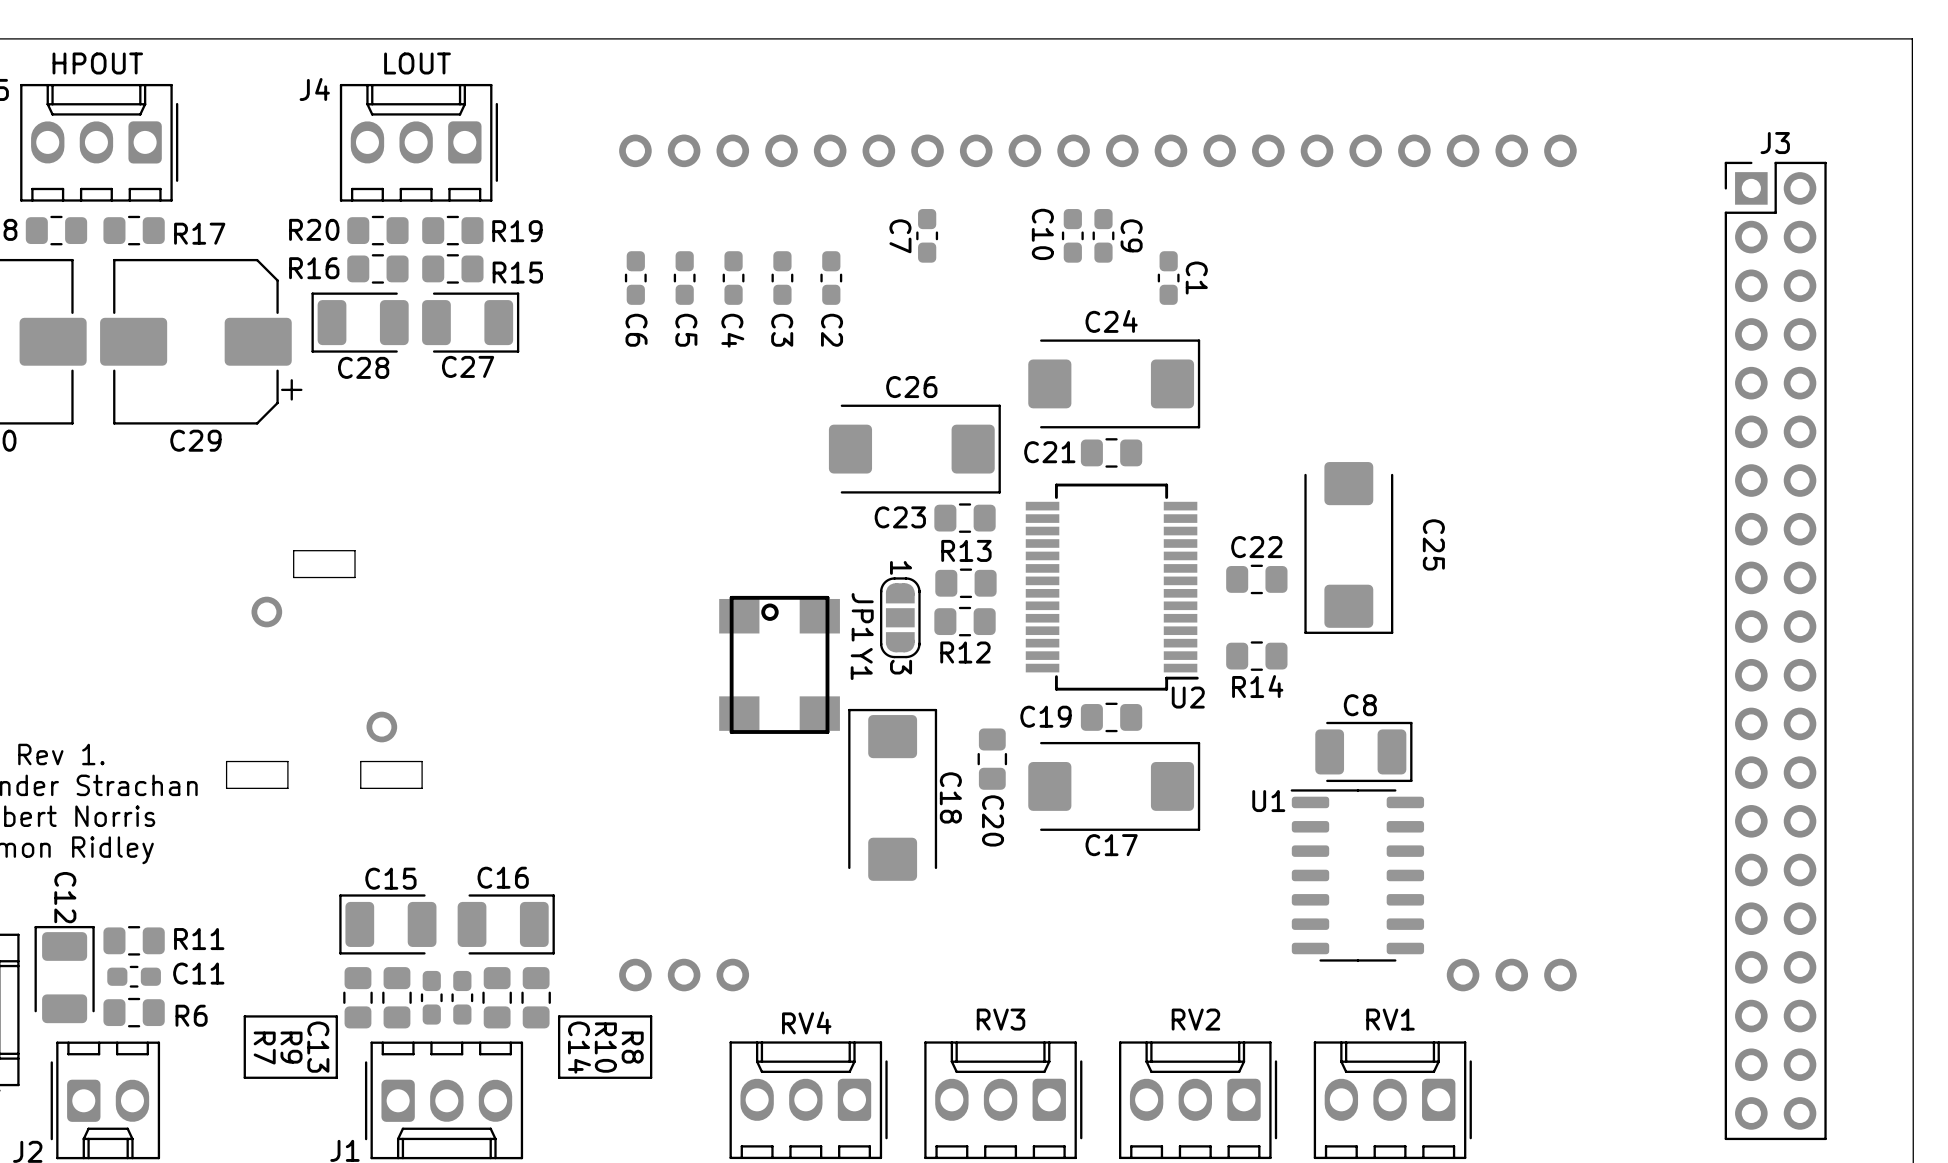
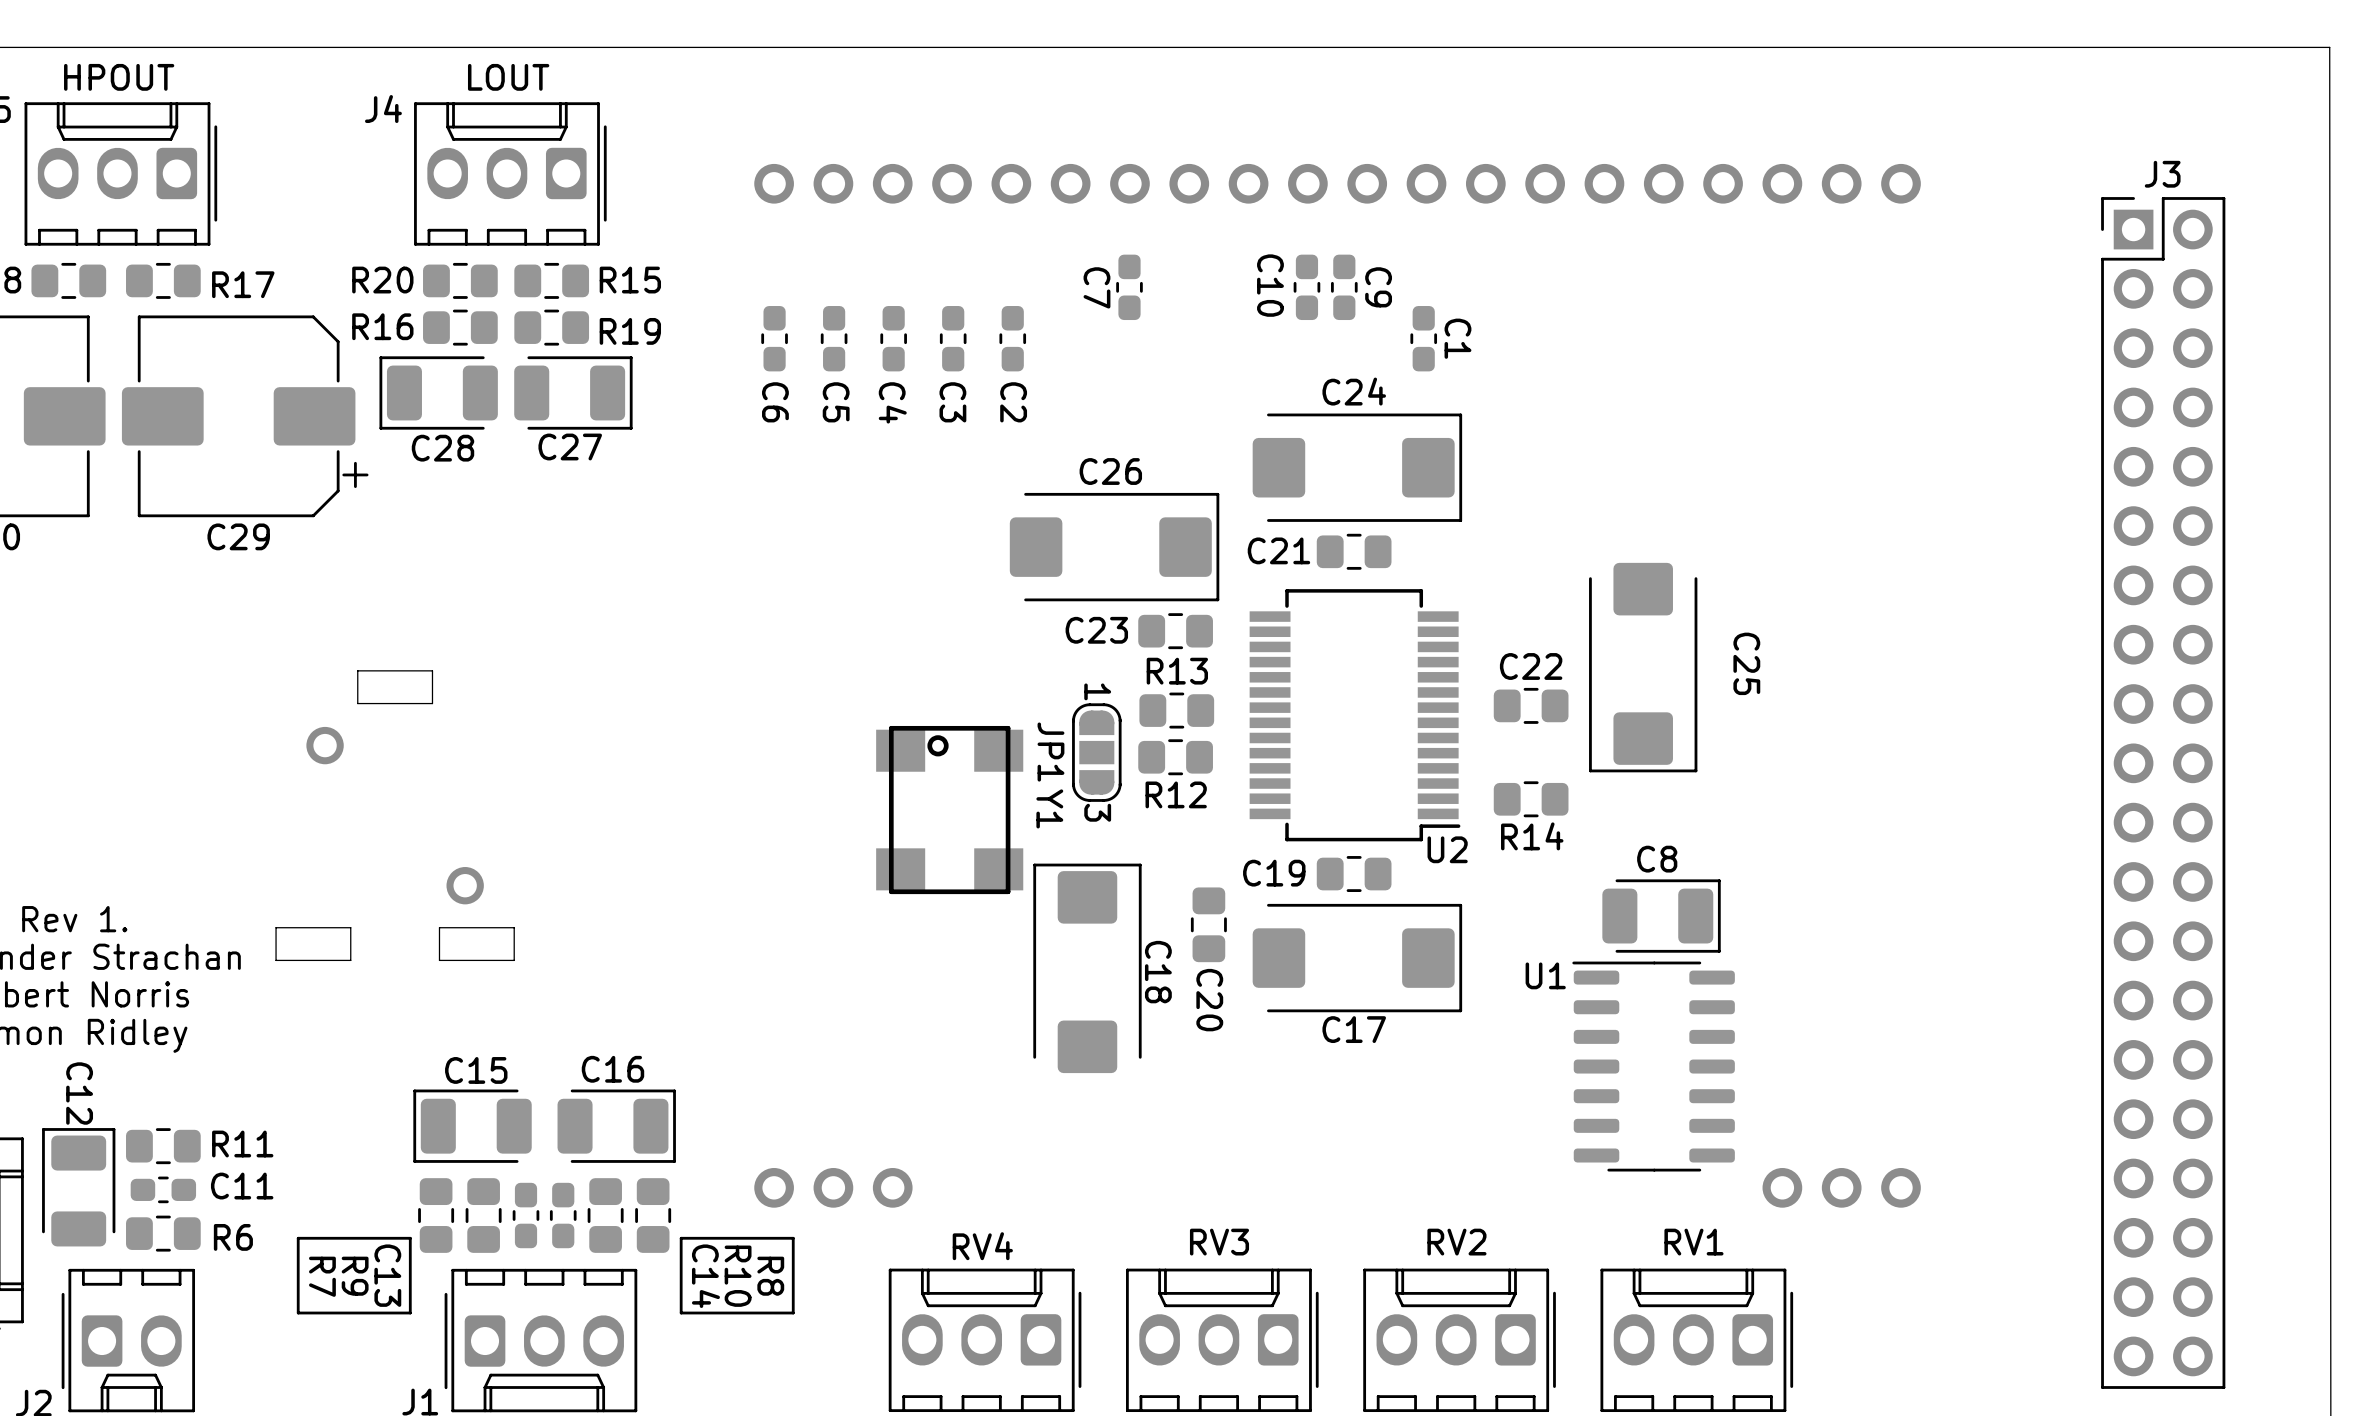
R19 name position: R19 (517, 231) -> R19 (630, 331)
R15 name position: R15 (517, 272) -> R15 (630, 280)

